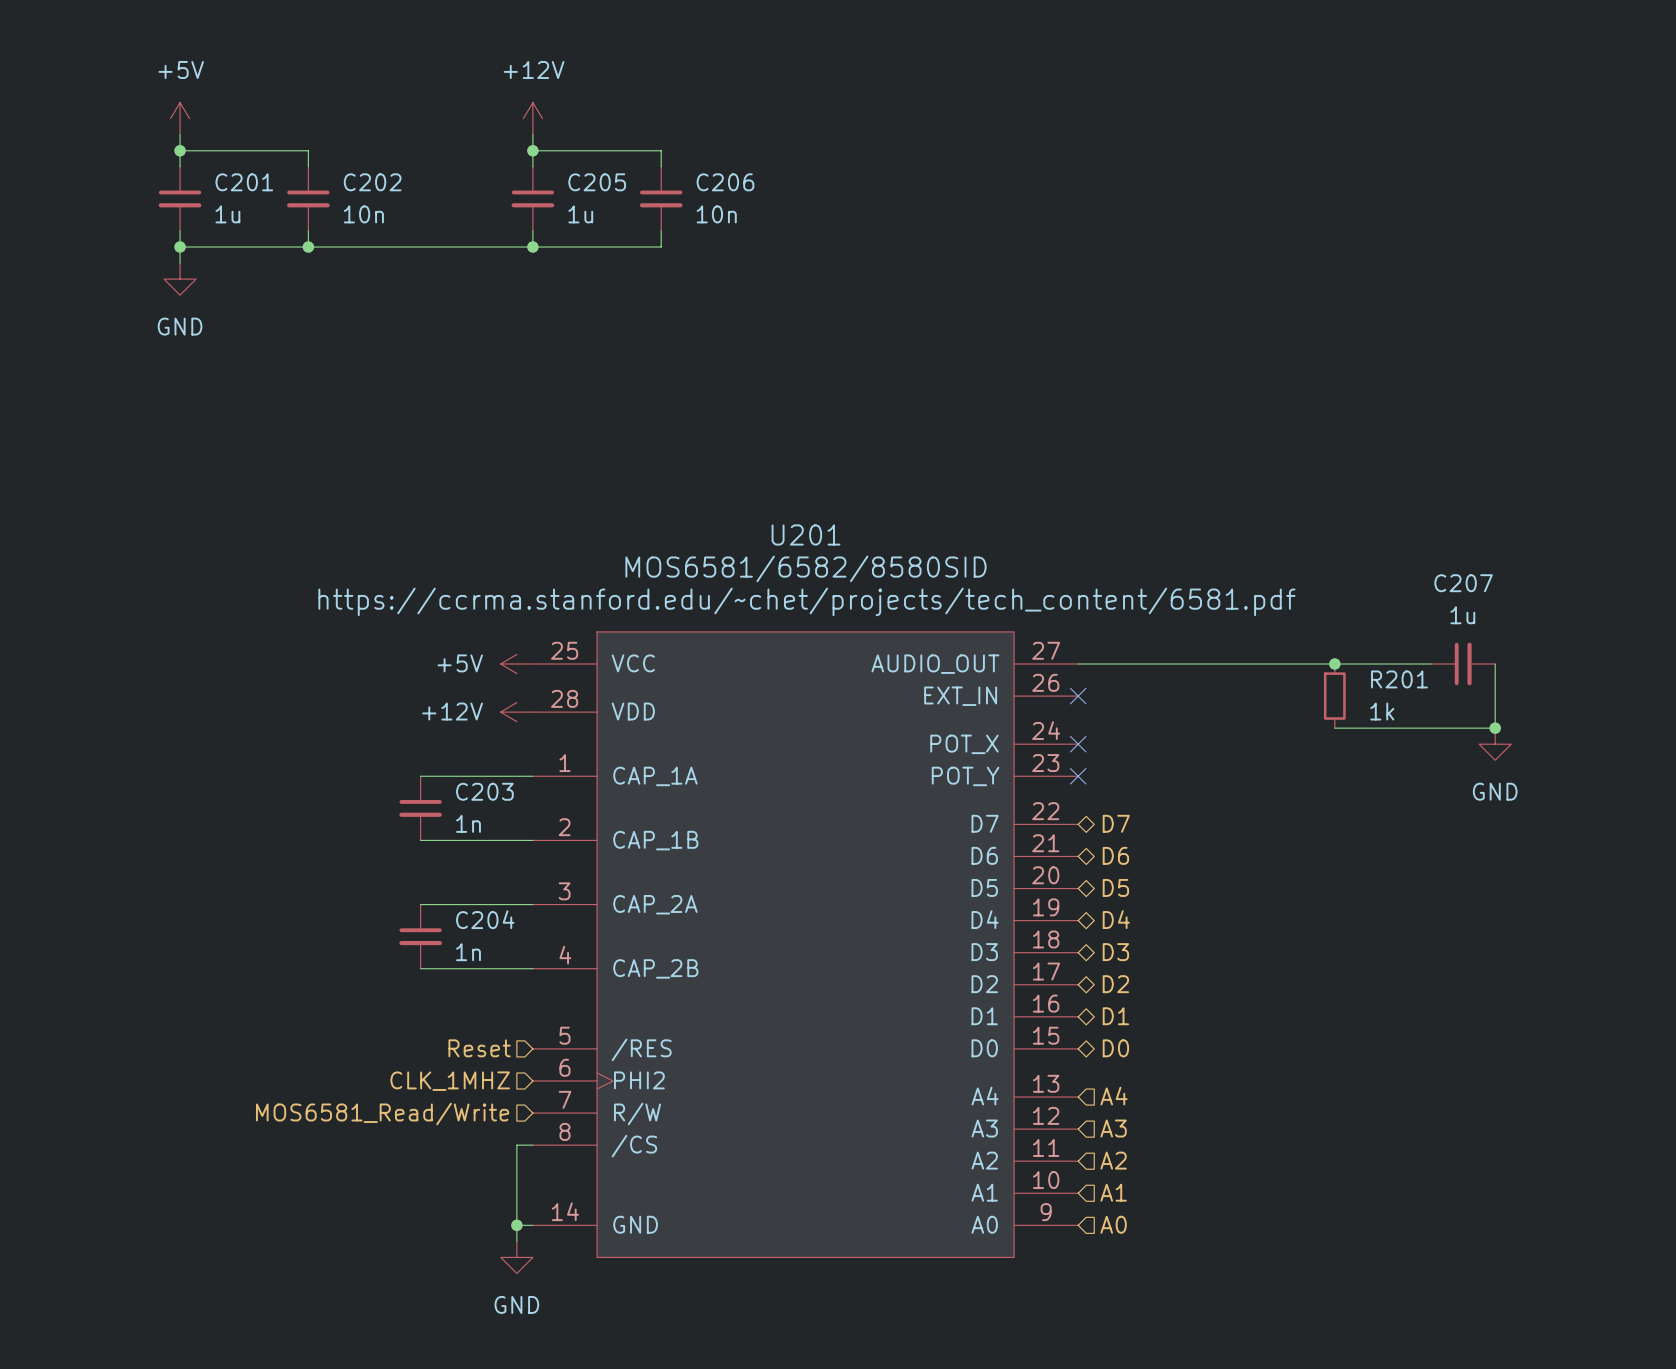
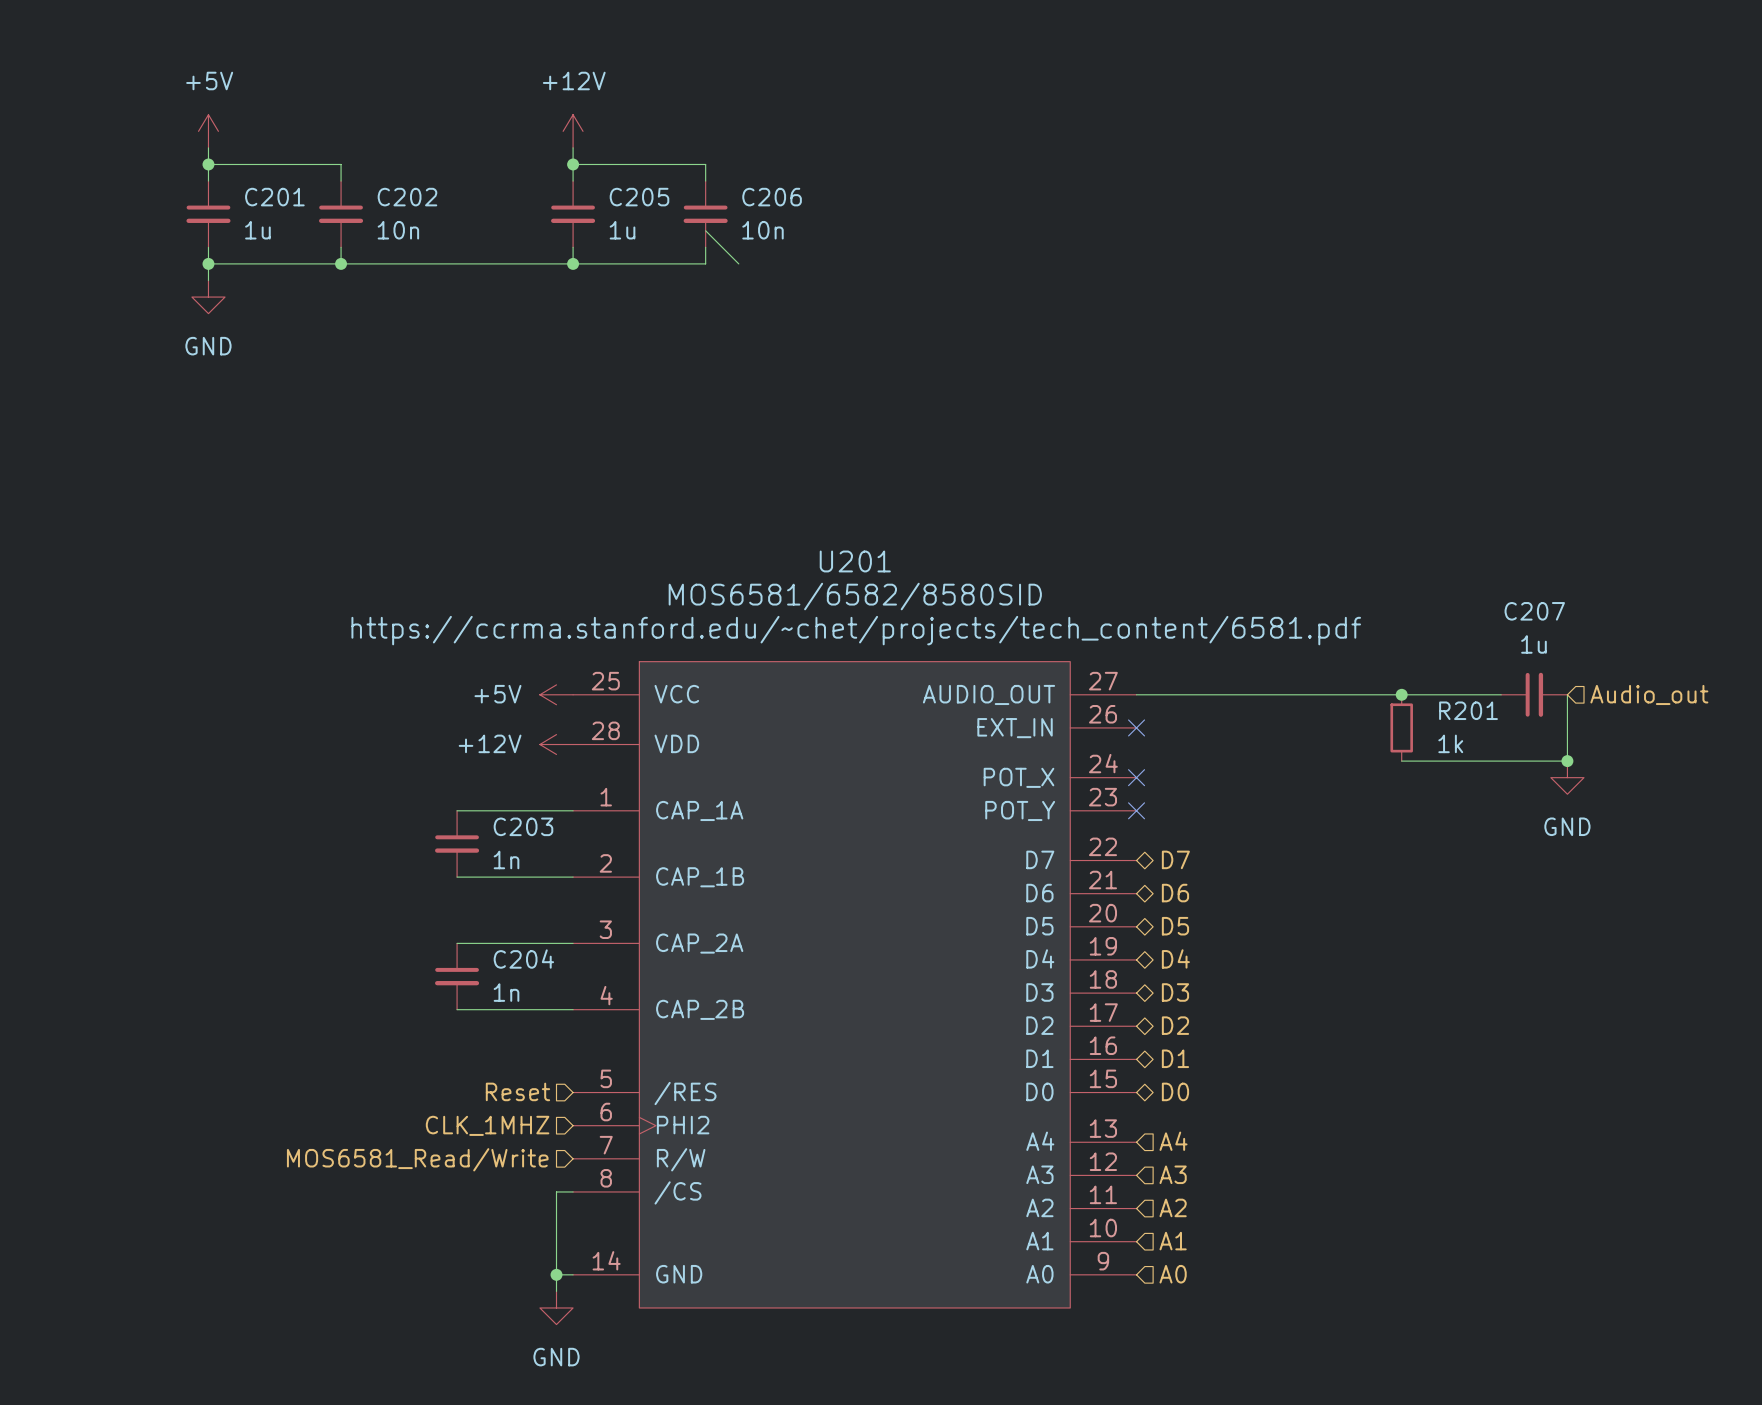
wire: none -> (705, 230) (738, 263)
hierarchical label: none -> Audio_out (1649, 694)

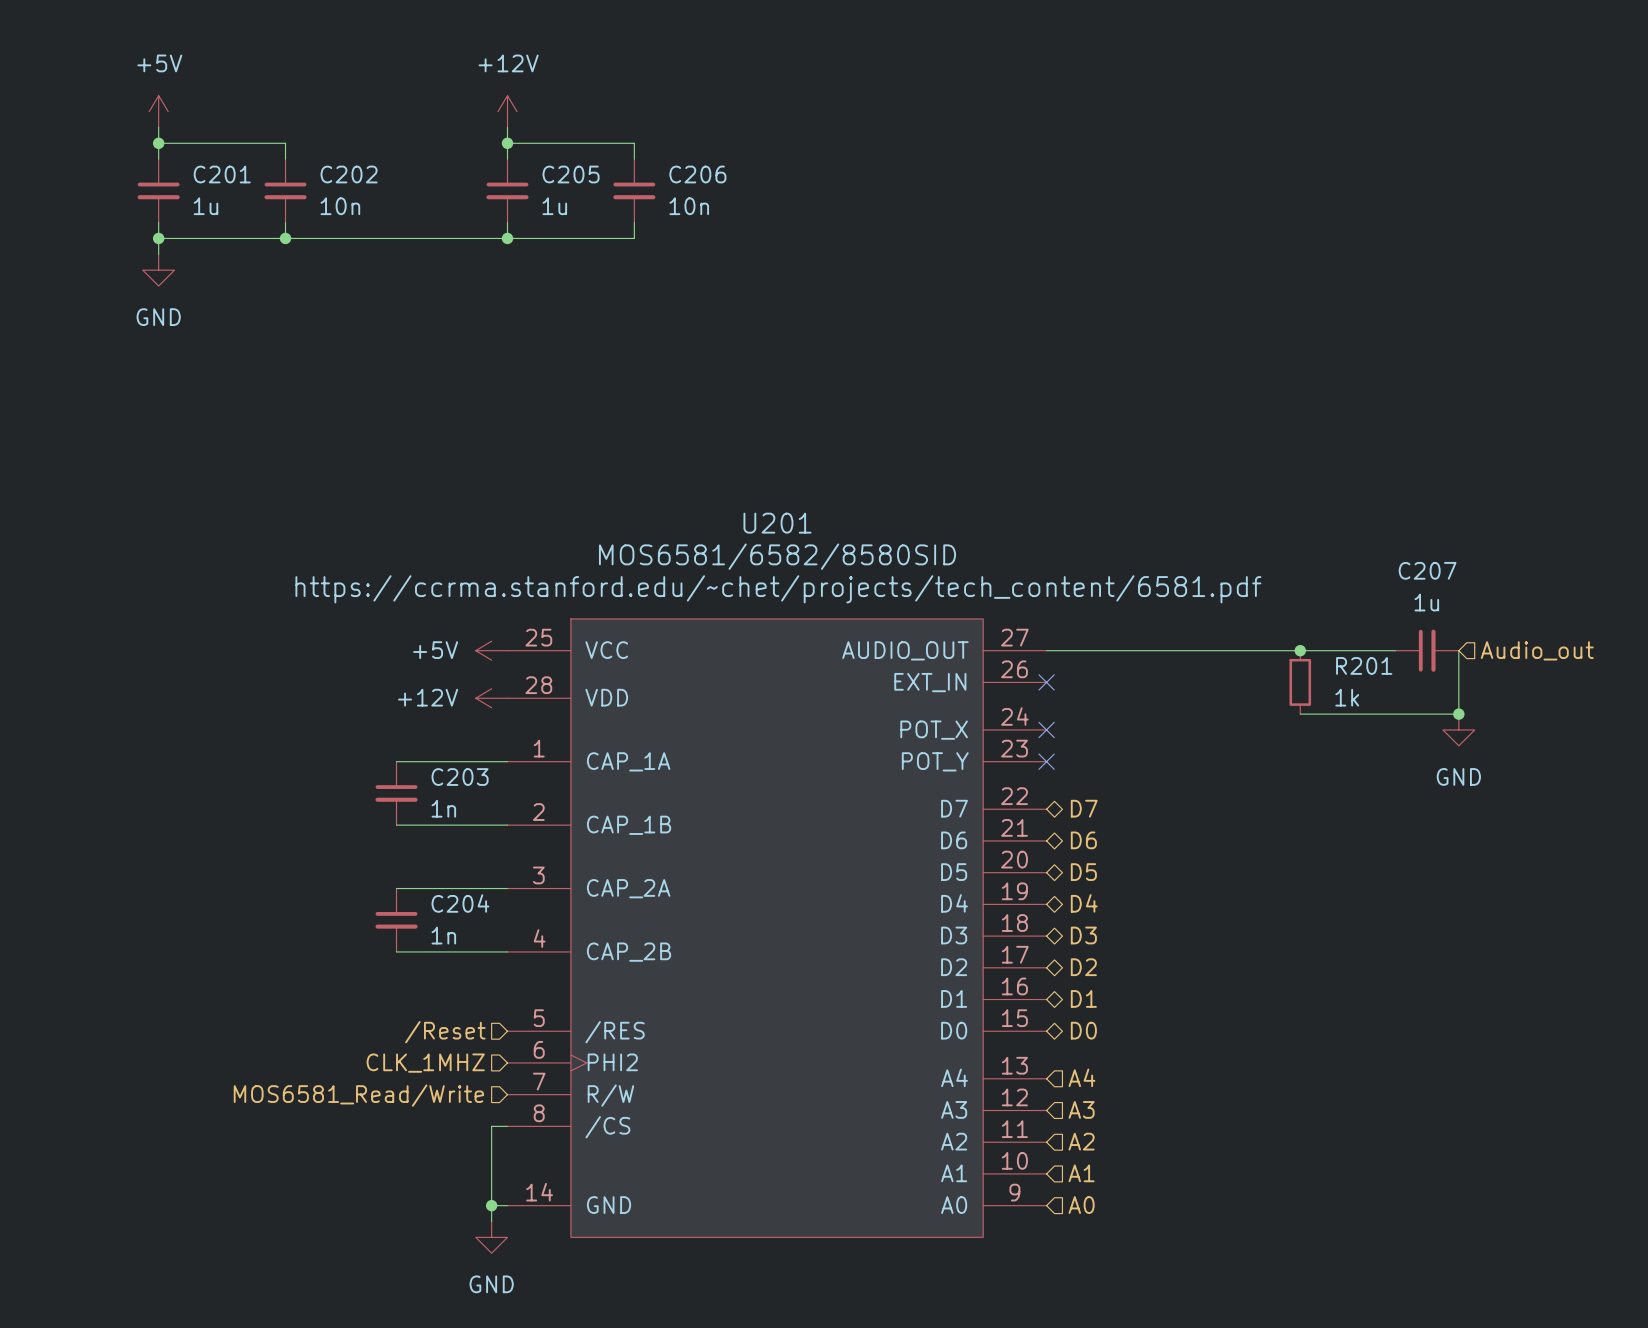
wire: (705, 230) (738, 263) -> none
hierarchical label: Reset (517, 1091) -> /Reset (445, 1032)

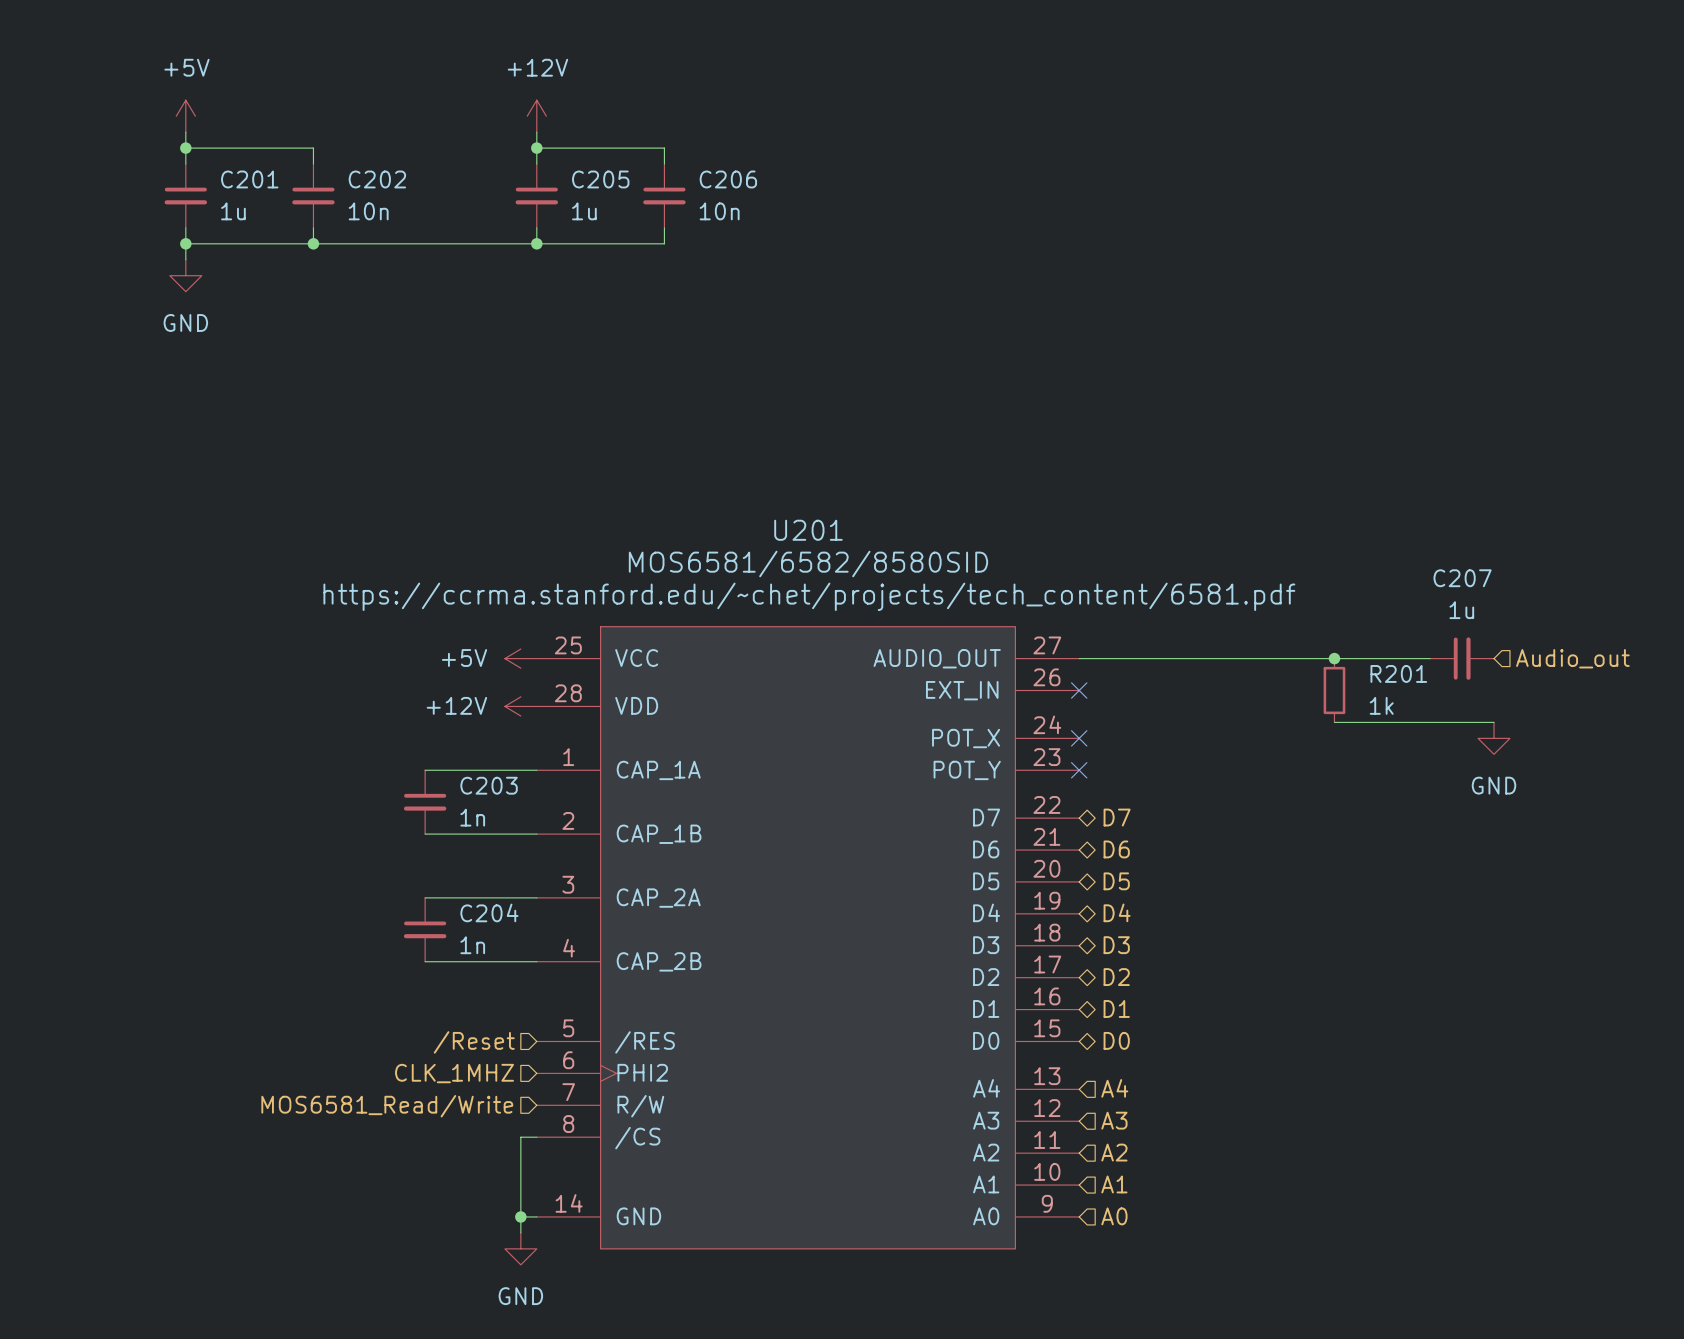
wire: (1458, 650) (1458, 714) -> none
junction: (1458, 714) -> none

